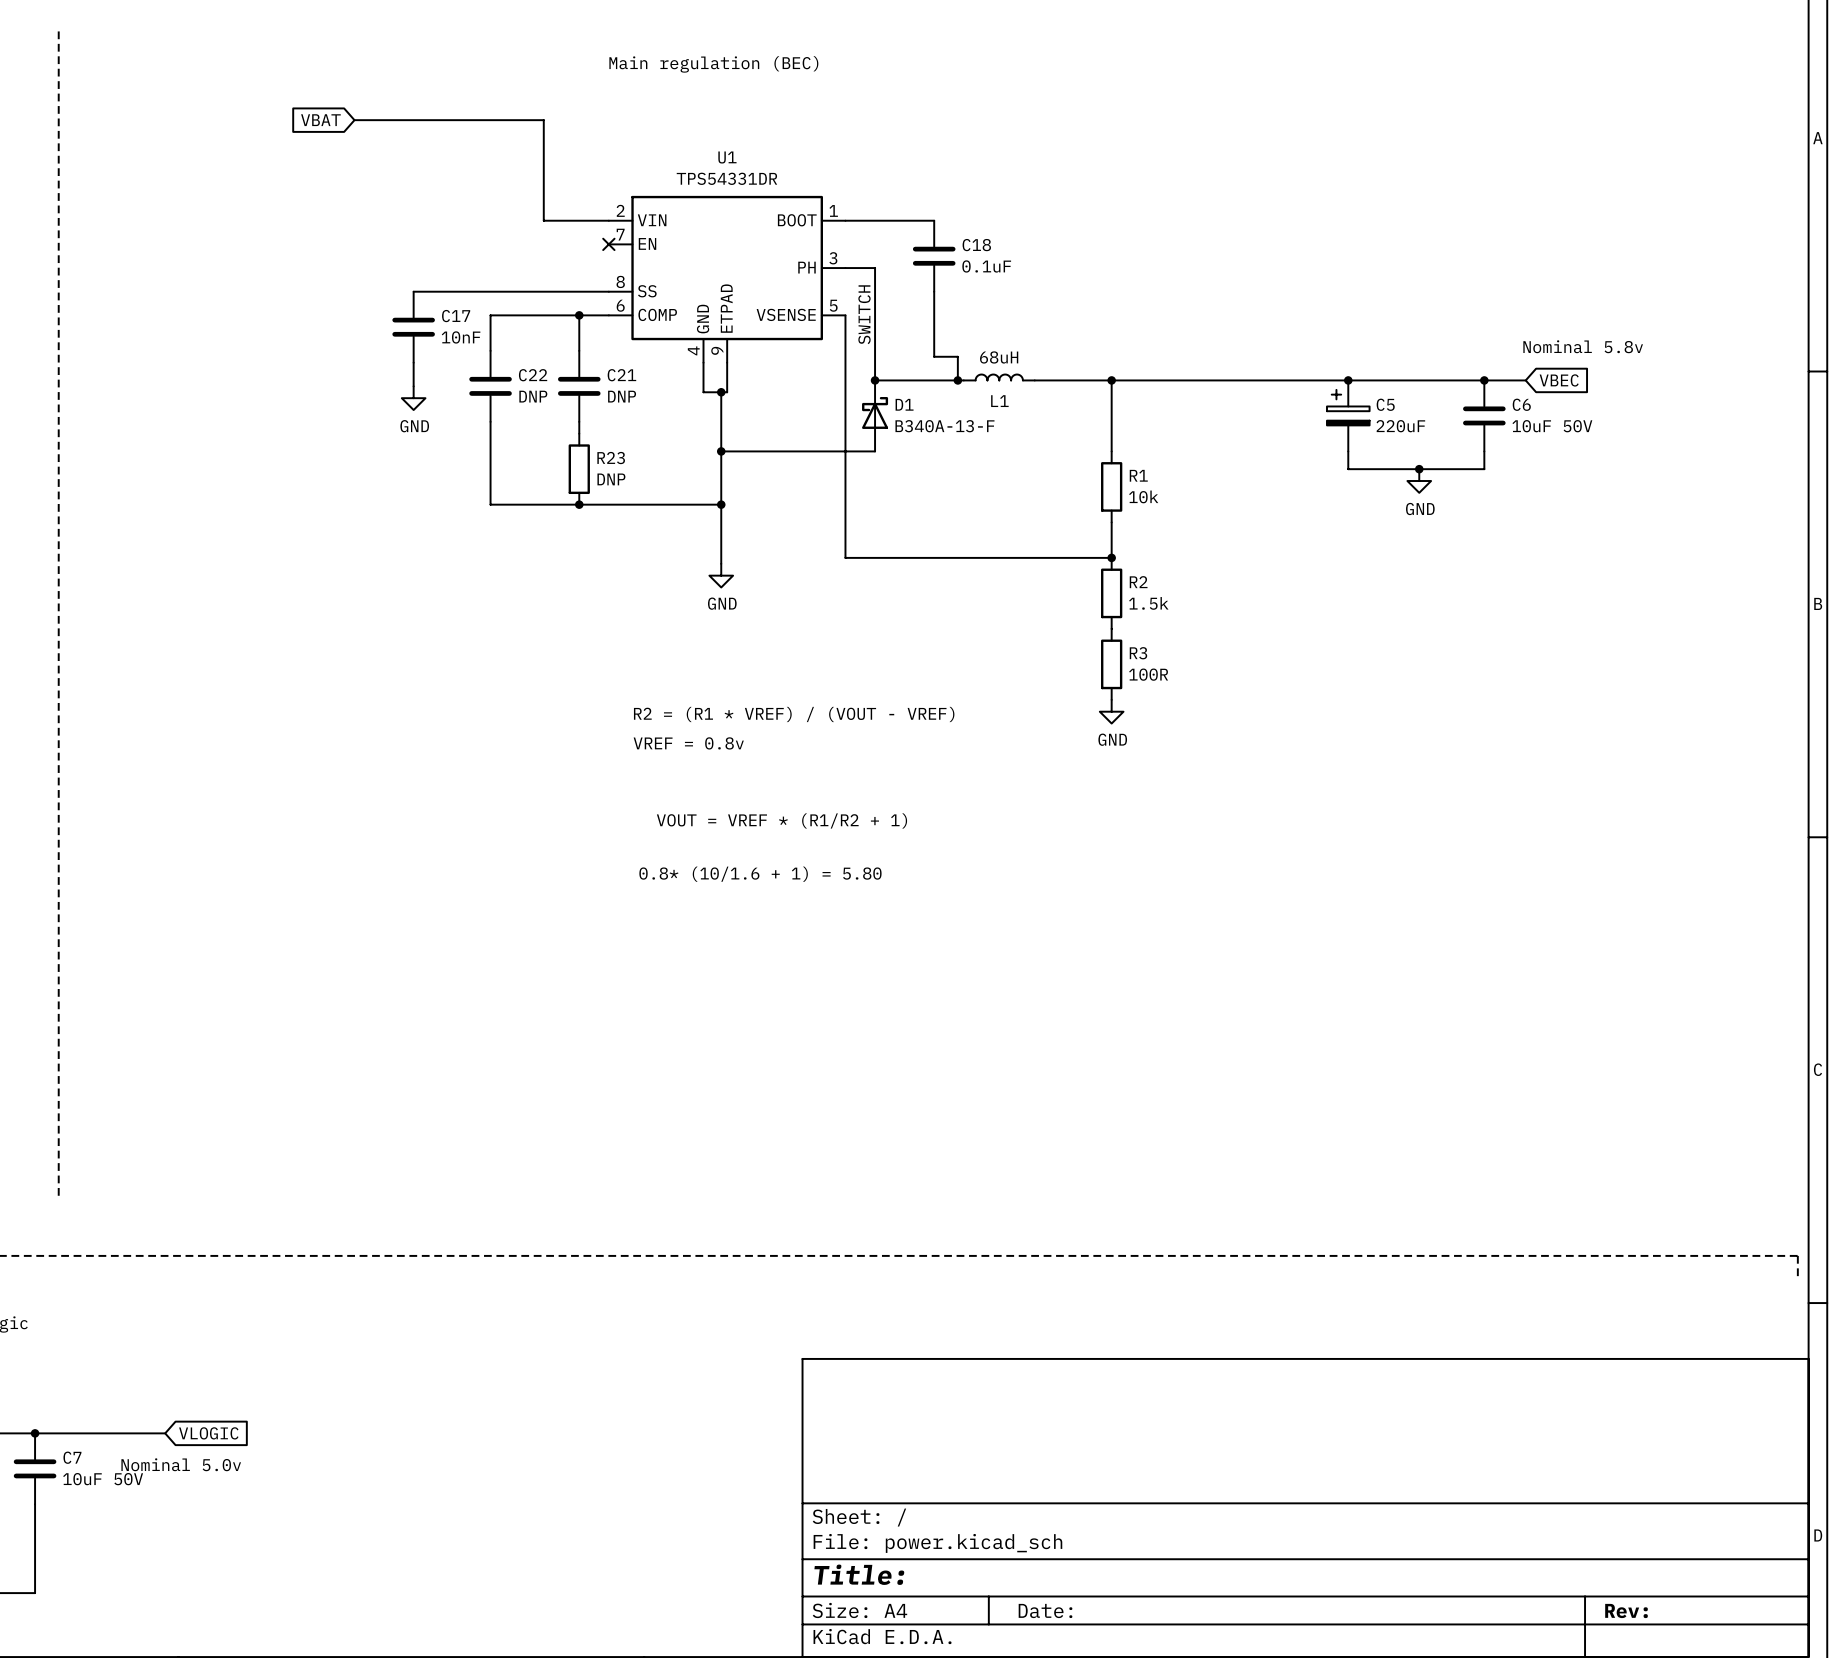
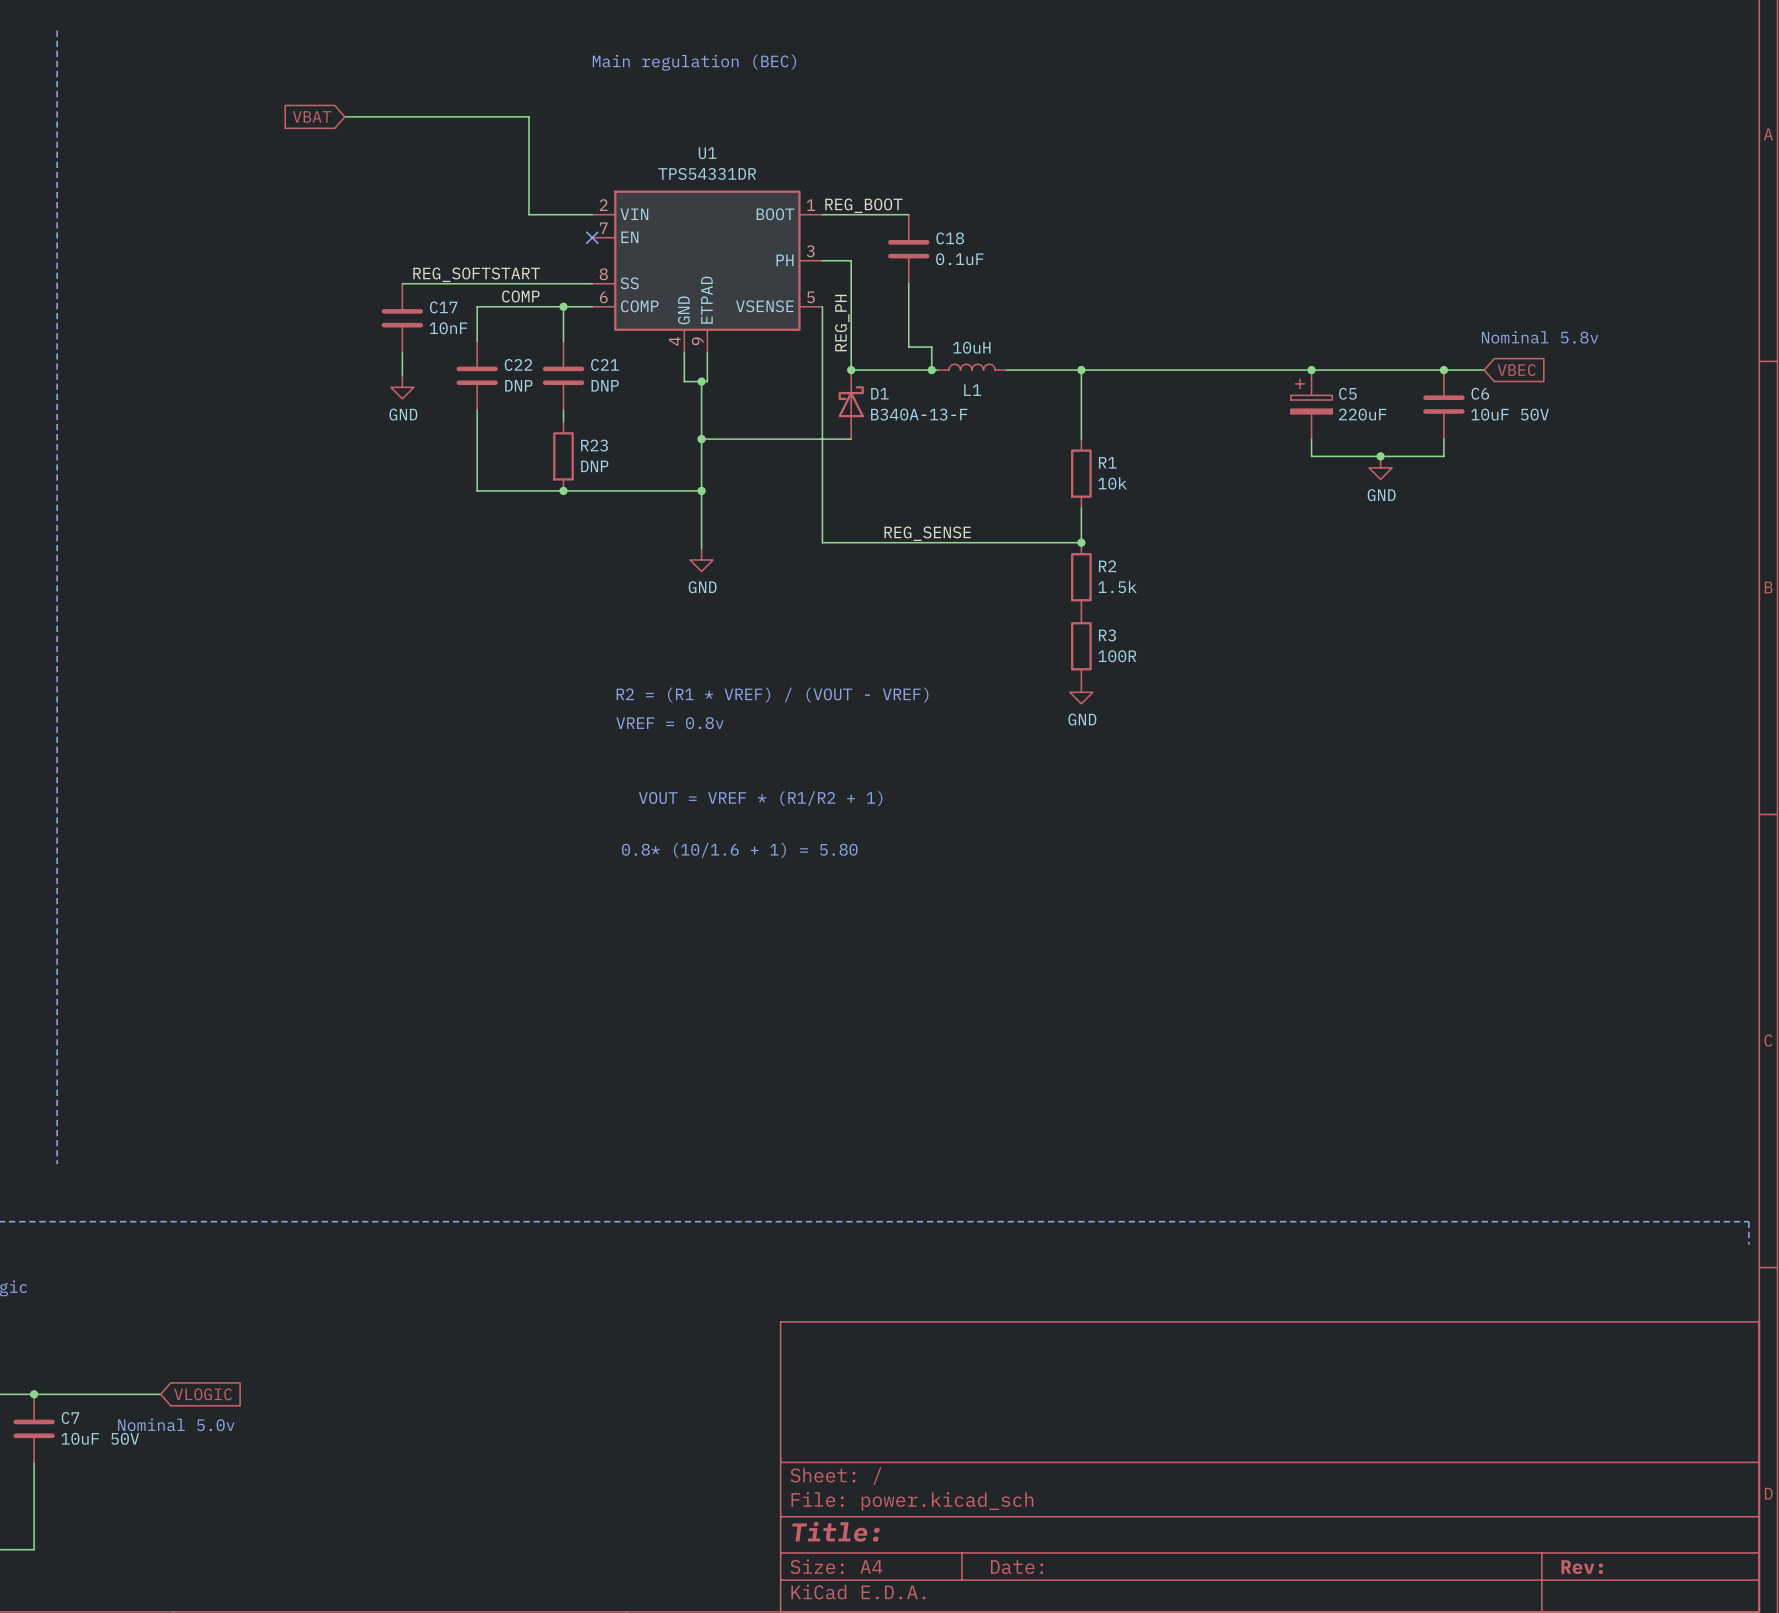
label: none -> REG_BOOT (863, 205)
label: none -> REG_SOFTSTART (476, 274)
label: none -> COMP (520, 296)
label: SWITCH (864, 314) -> none
label: none -> REG_PH (842, 323)
L1 value: 68uH (999, 357) -> 10uH (971, 347)
label: none -> REG_SENSE (927, 533)

